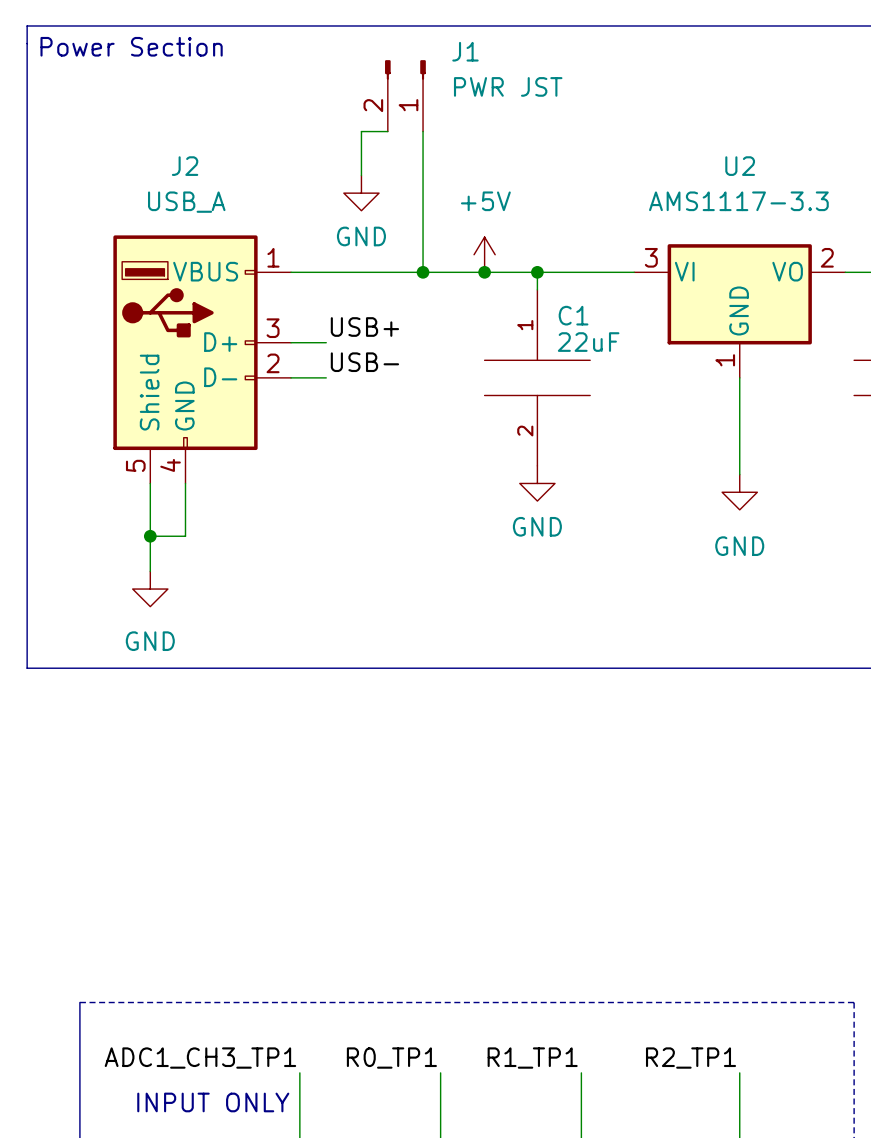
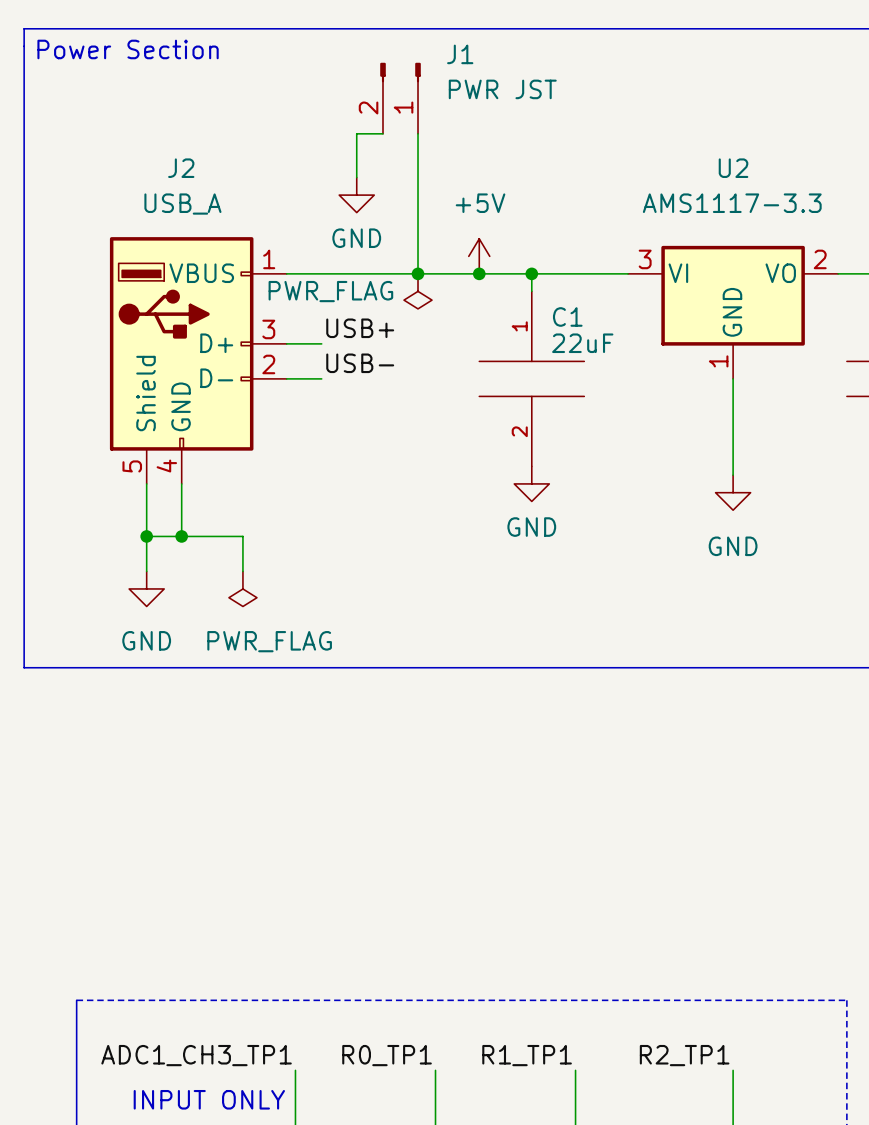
power symbol: none -> PWR_FLAG (418, 291)
wire: none -> (181, 536) (242, 536) (242, 571)
junction: none -> (181, 536)
power symbol: none -> PWR_FLAG (242, 588)

